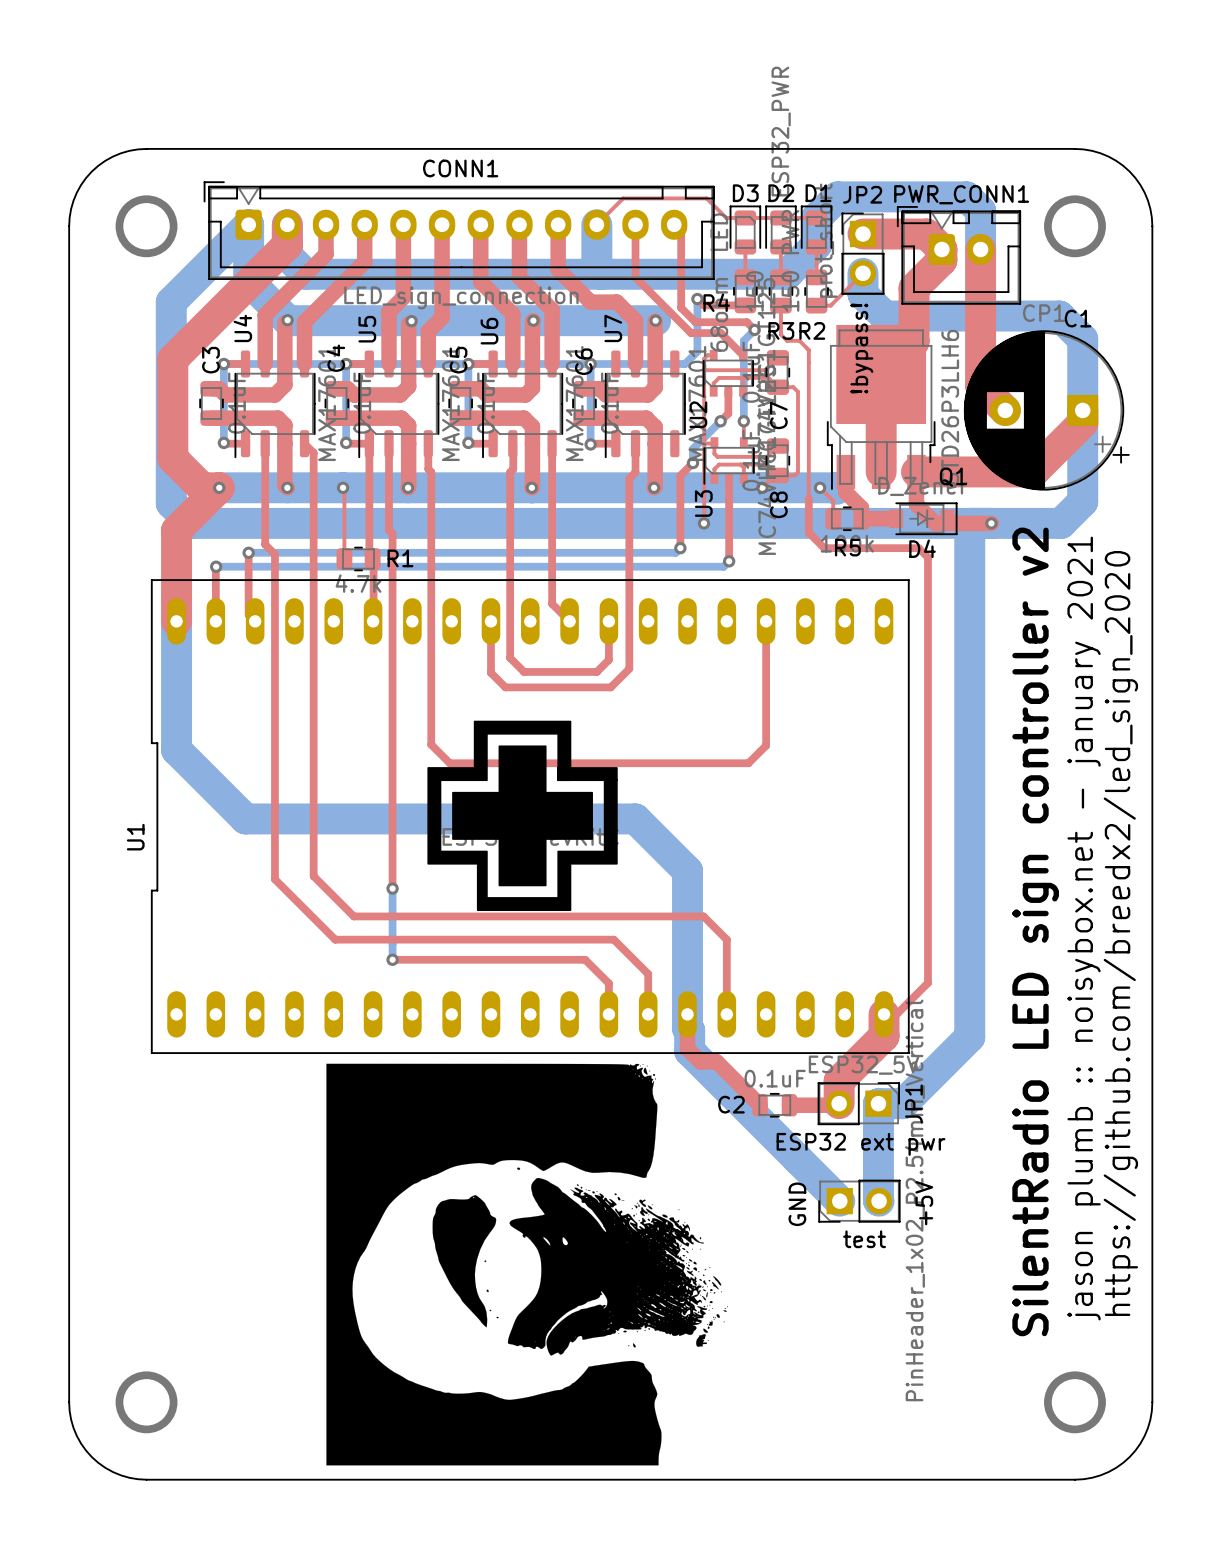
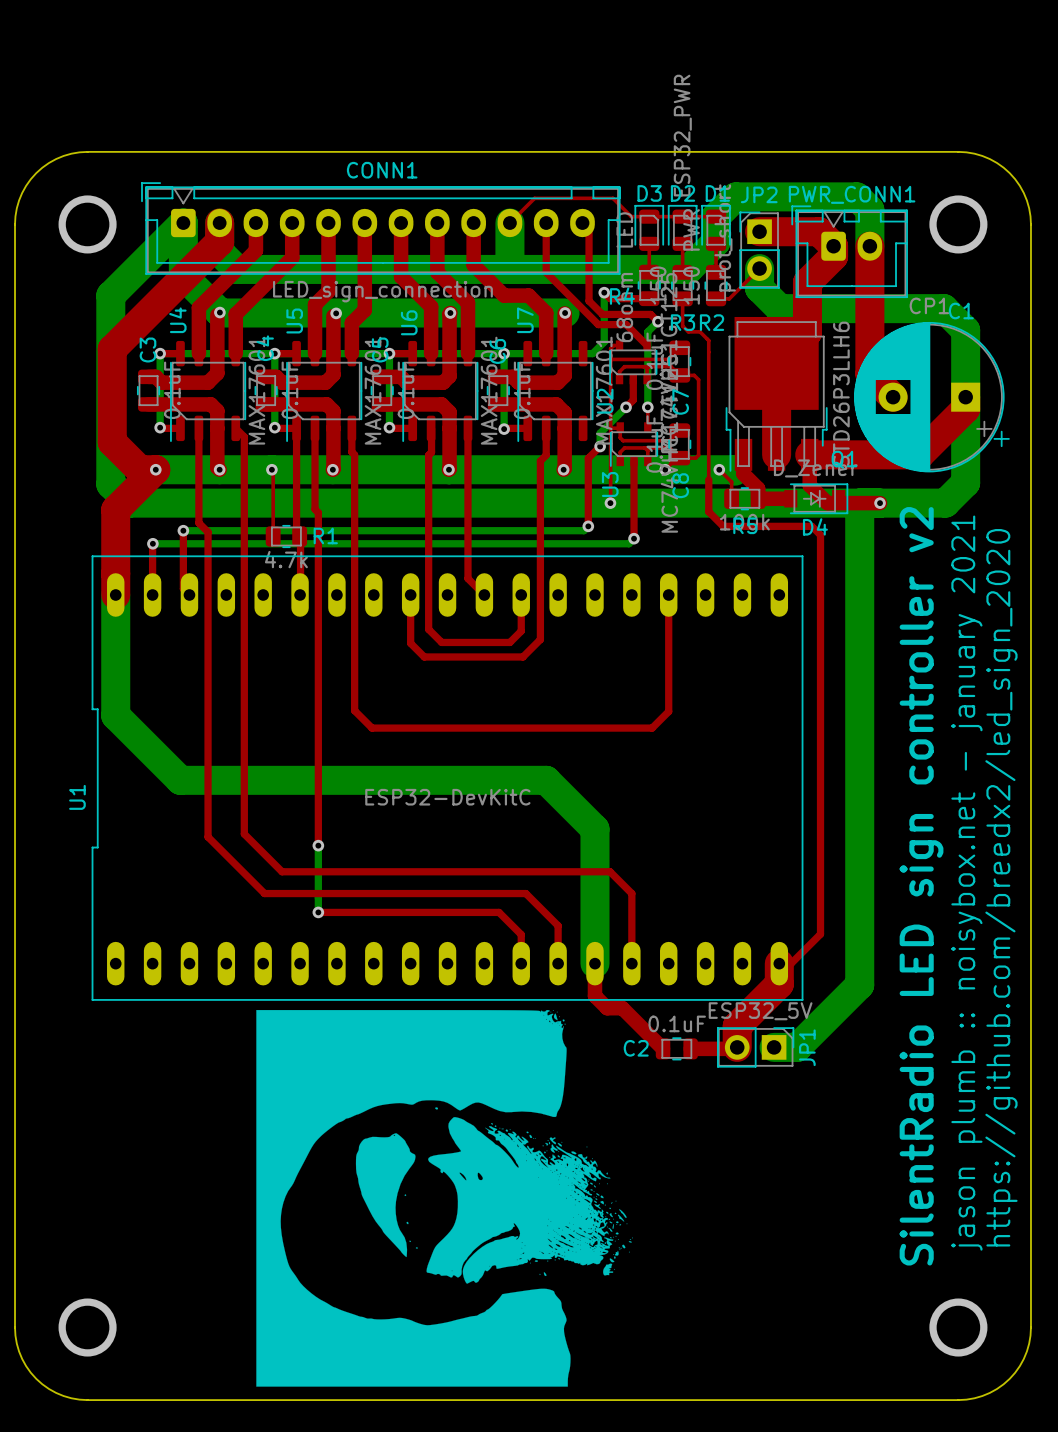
text: !bypass! (861, 348) -> none
drawing: [427, 720, 618, 912] -> none
bottom track: (687, 1014) (689, 1051) (839, 1201) -> none
bottom track: (878, 1103) (879, 1201) -> none
text: ESP32 ext pwr (861, 1144) -> none
test: PinHeader_1x02_P2.54mm_Vertical (859, 1201) -> none
text: +5V (924, 1203) -> none
text: GND (797, 1204) -> none

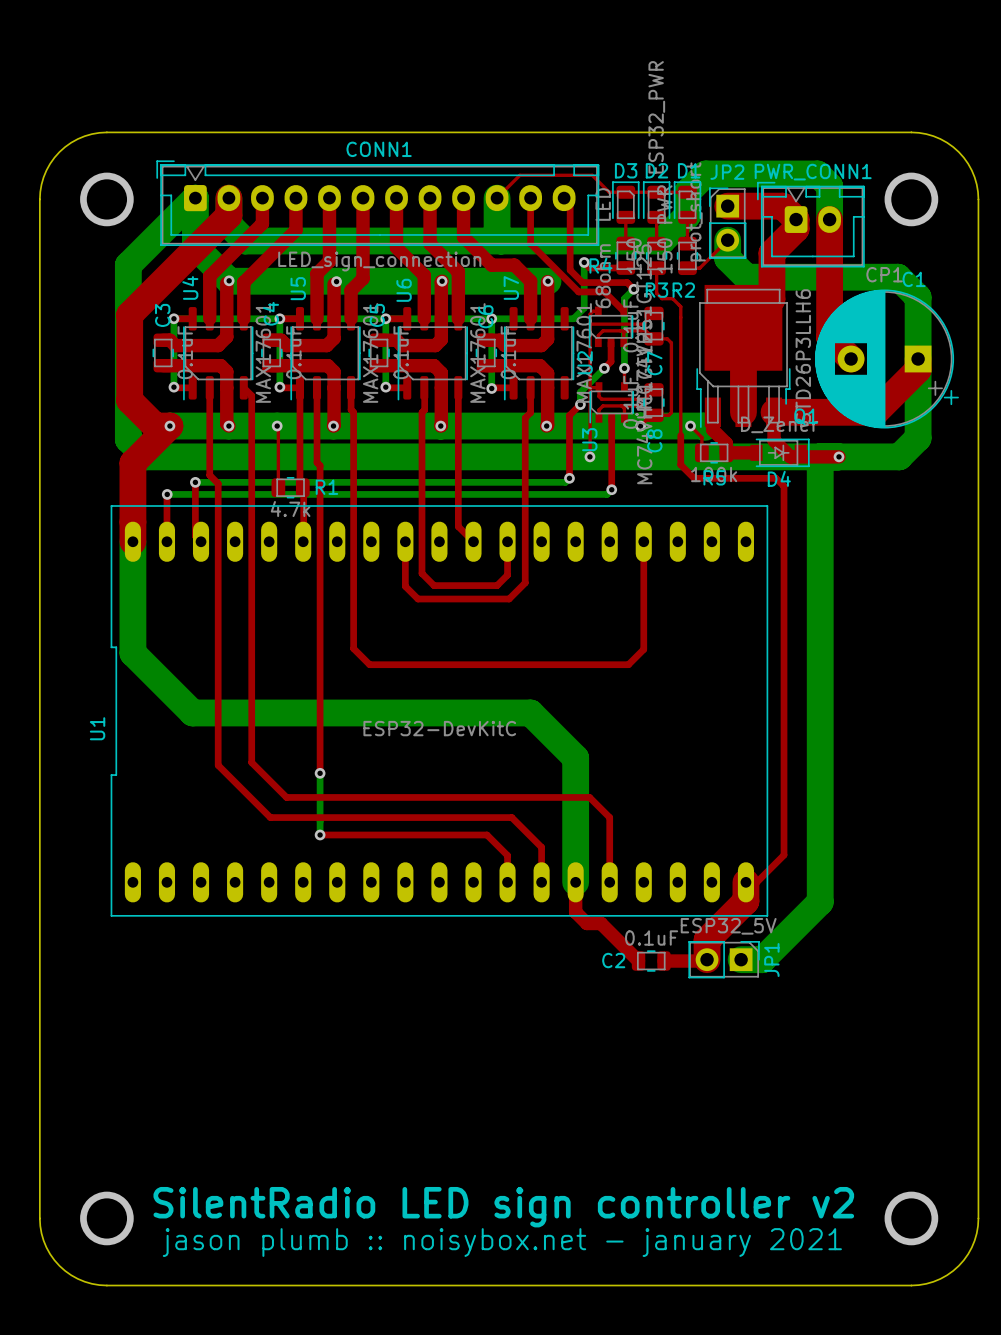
text: jason plumb :: noisybox.net - january 2021 (966, 883) -> none
text: SilentRadio LED sign controller v2 (921, 886) -> none
text: https://github.com/breedx2/led_sign_2020 (1001, 887) -> none
drawing: [256, 1010, 633, 1387] -> none
text: none -> SilentRadio LED sign controller v2 (503, 1207)
text: none -> jason plumb :: noisybox.net - january 2021 (502, 1242)

